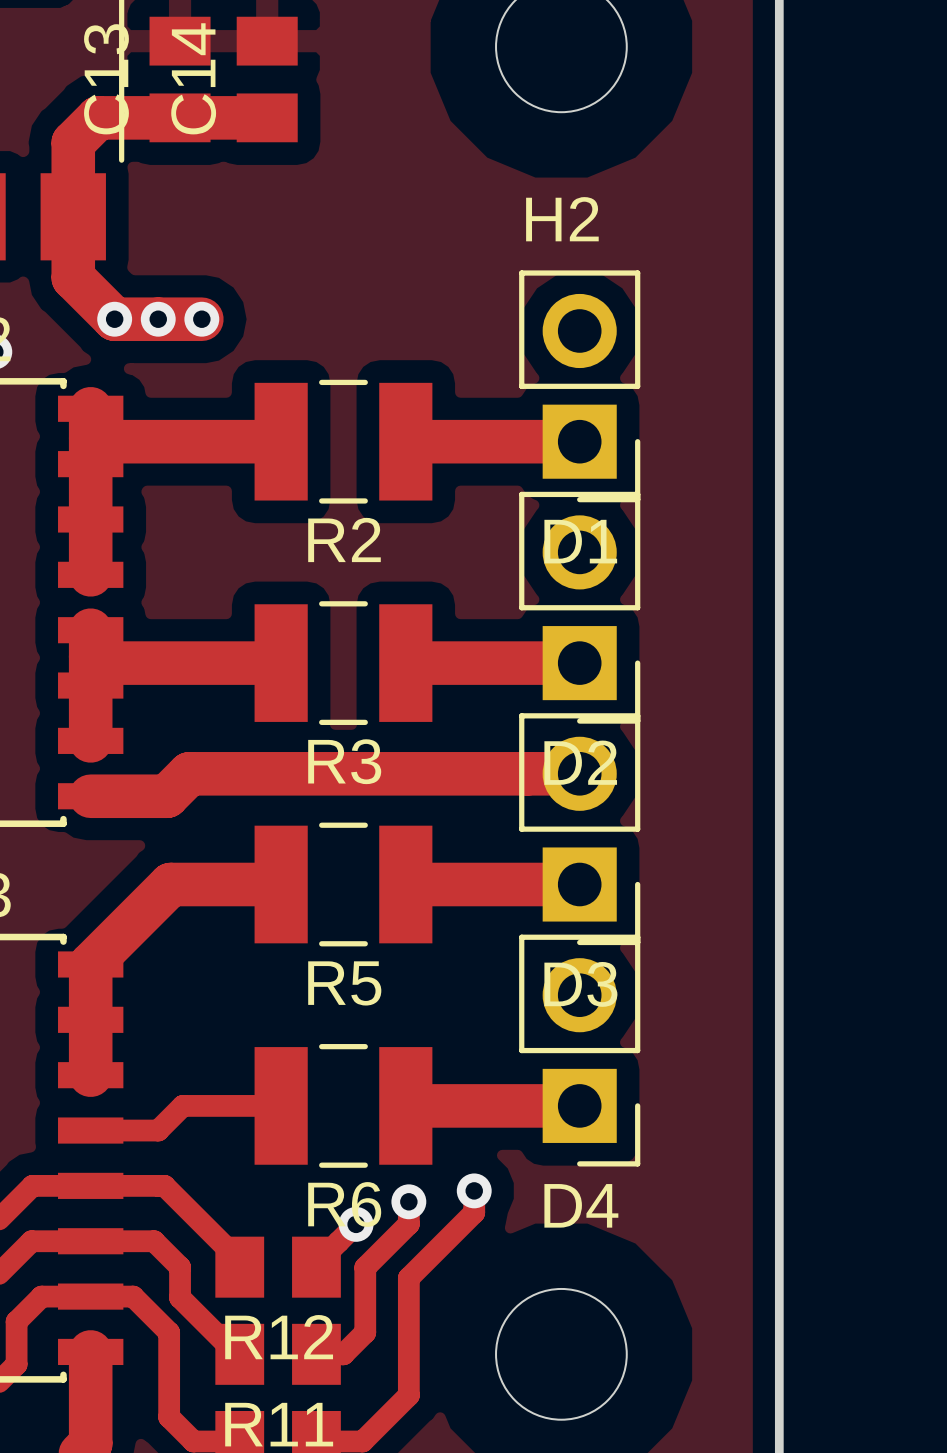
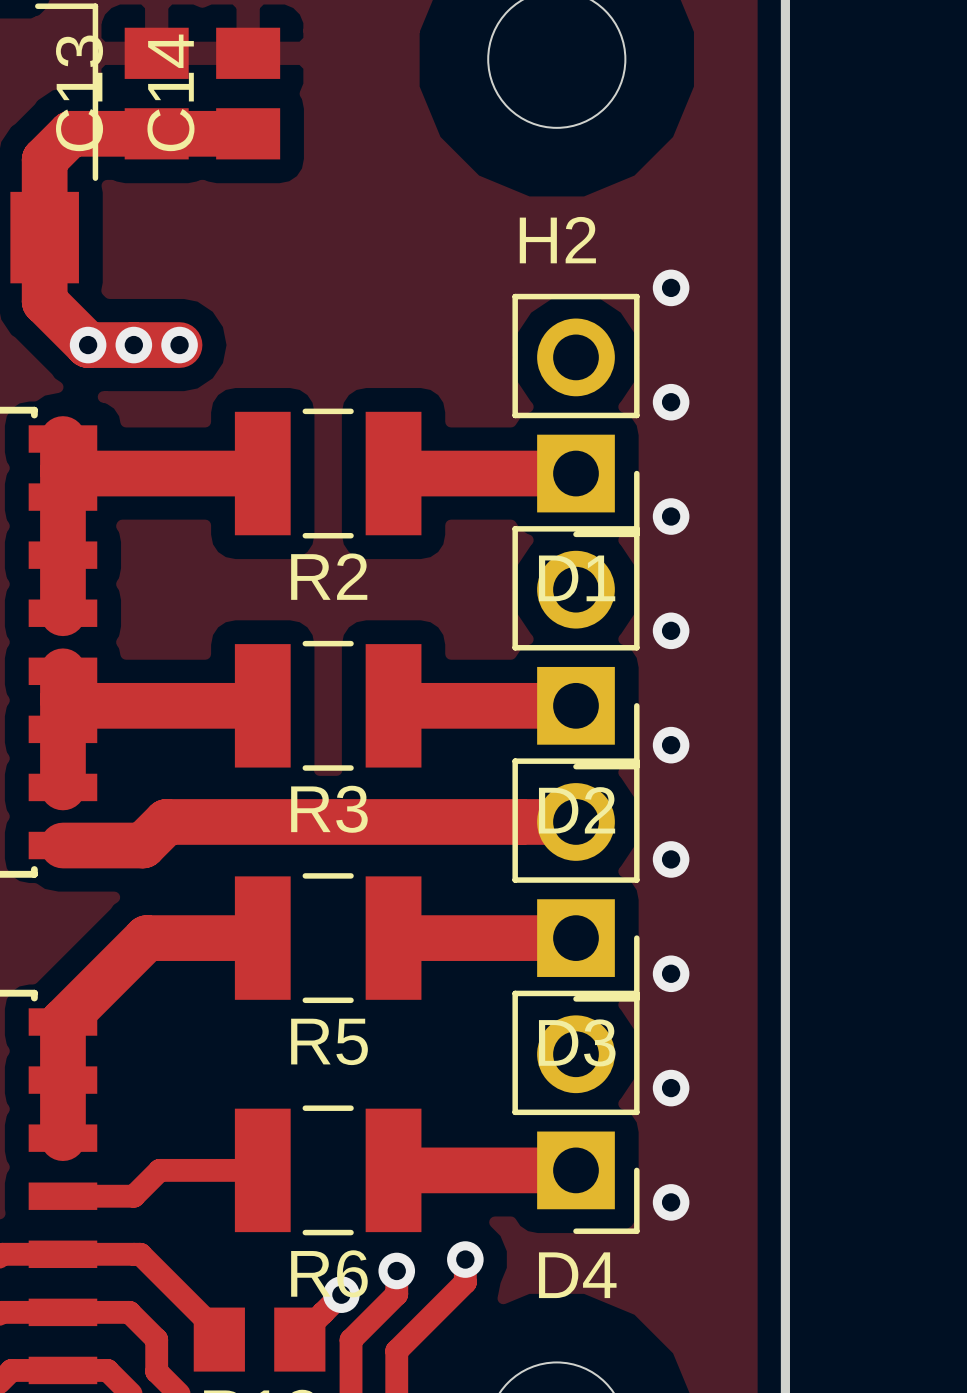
via: none -> (671, 287)
via: none -> (671, 402)
via: none -> (671, 516)
via: none -> (671, 630)
via: none -> (671, 745)
via: none -> (671, 859)
via: none -> (671, 973)
via: none -> (671, 1088)
via: none -> (671, 1202)

